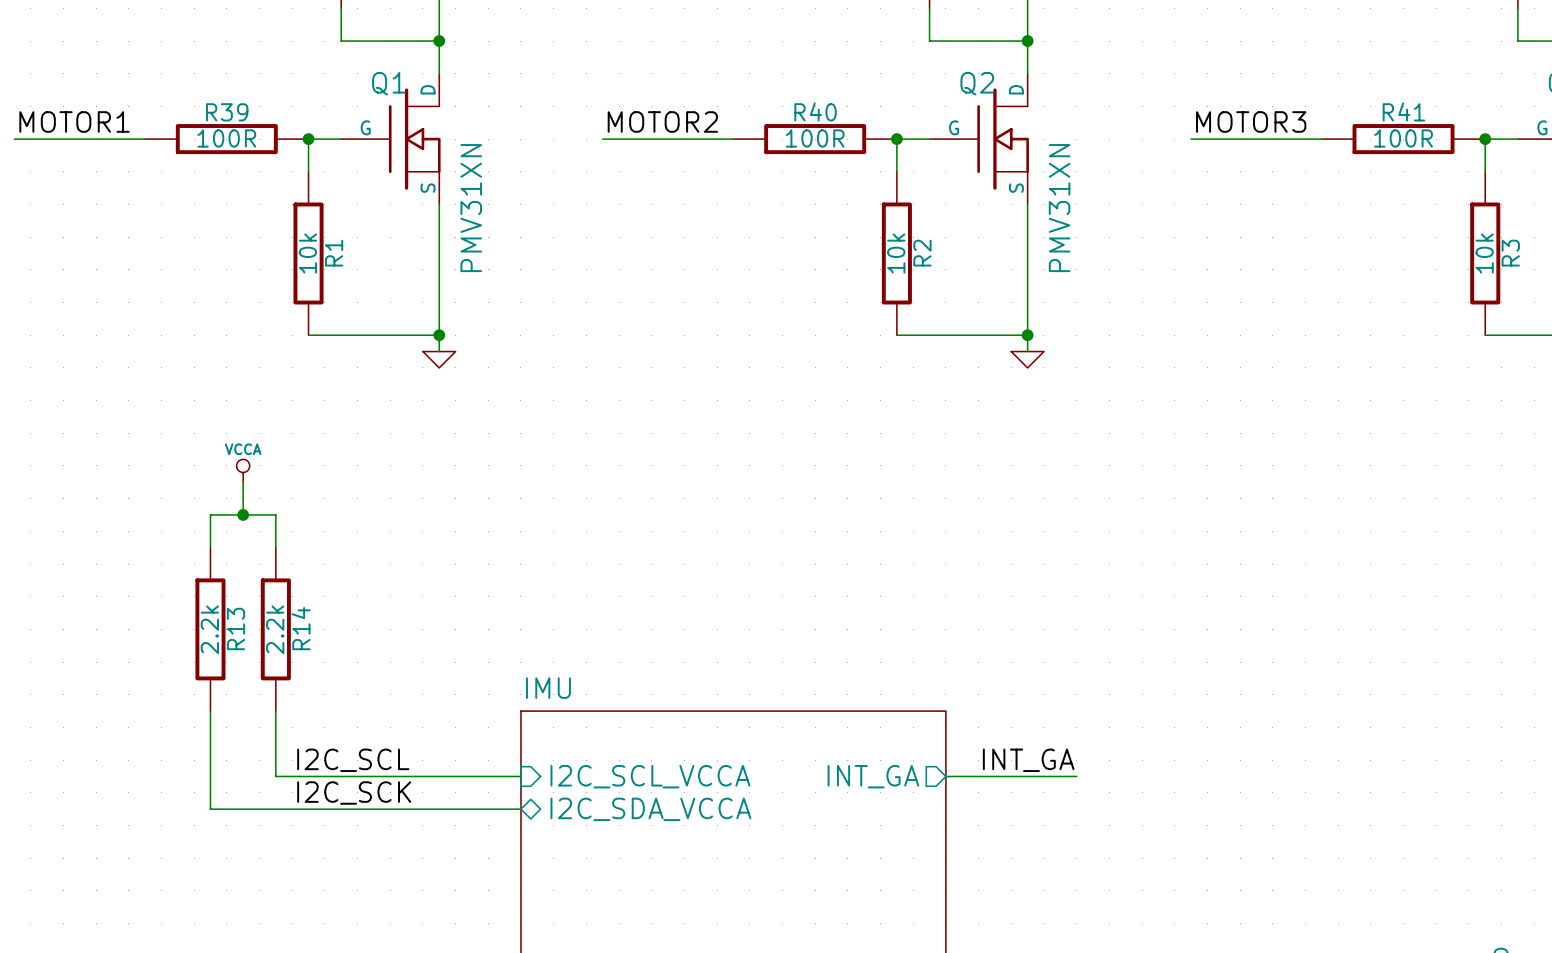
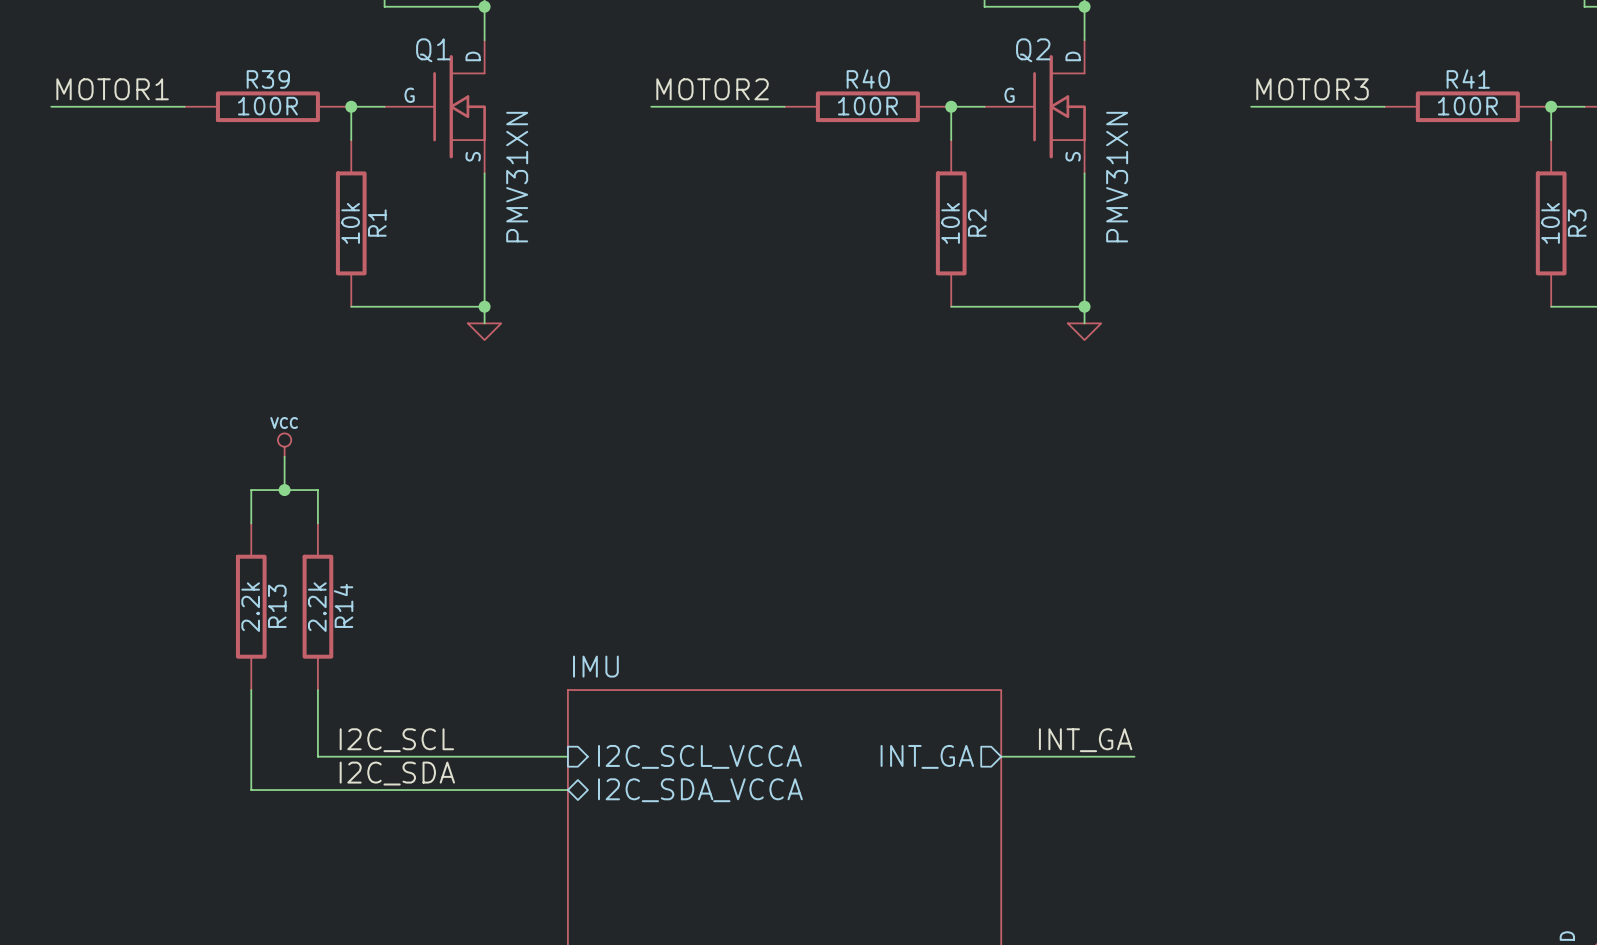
power symbol: VCCA (243, 470) -> VCC (284, 445)
label: I2C_SCK (354, 792) -> I2C_SDA (397, 773)

